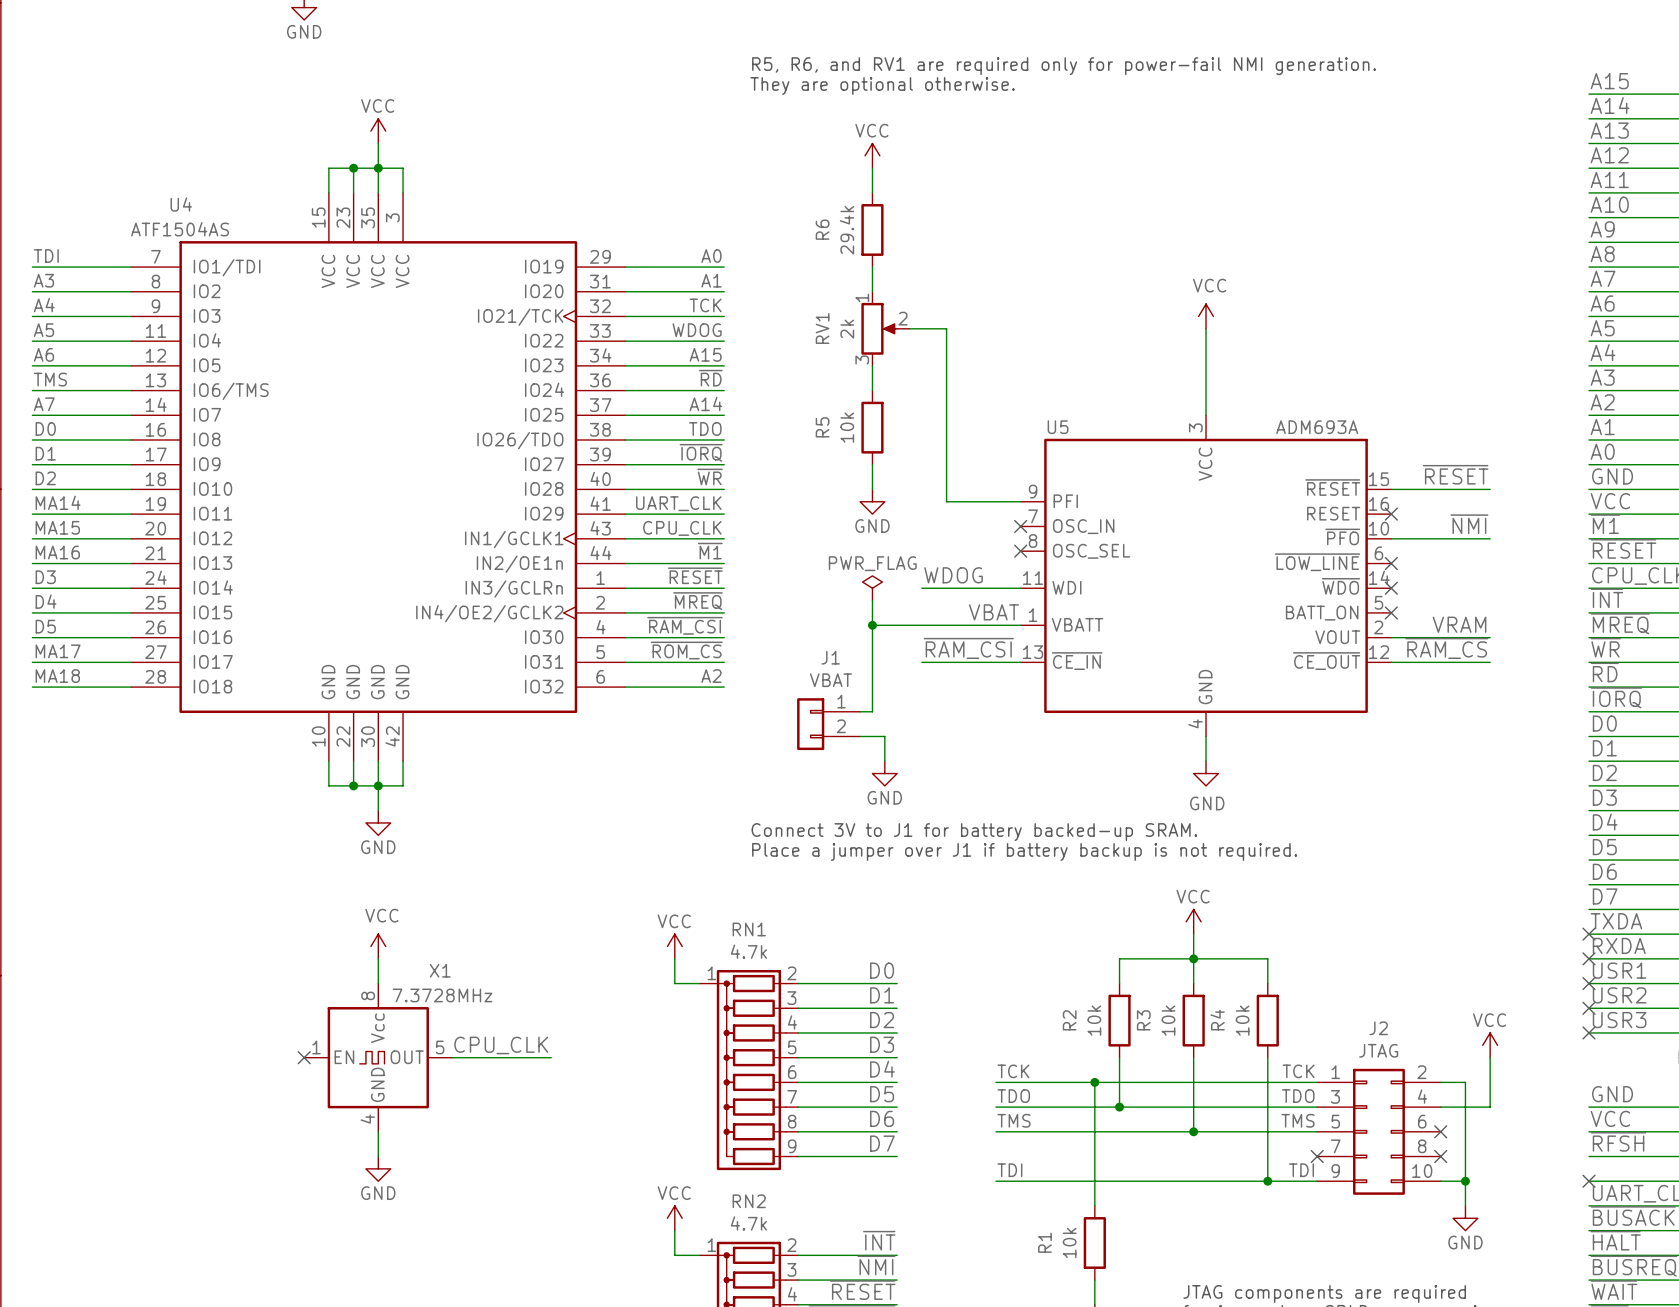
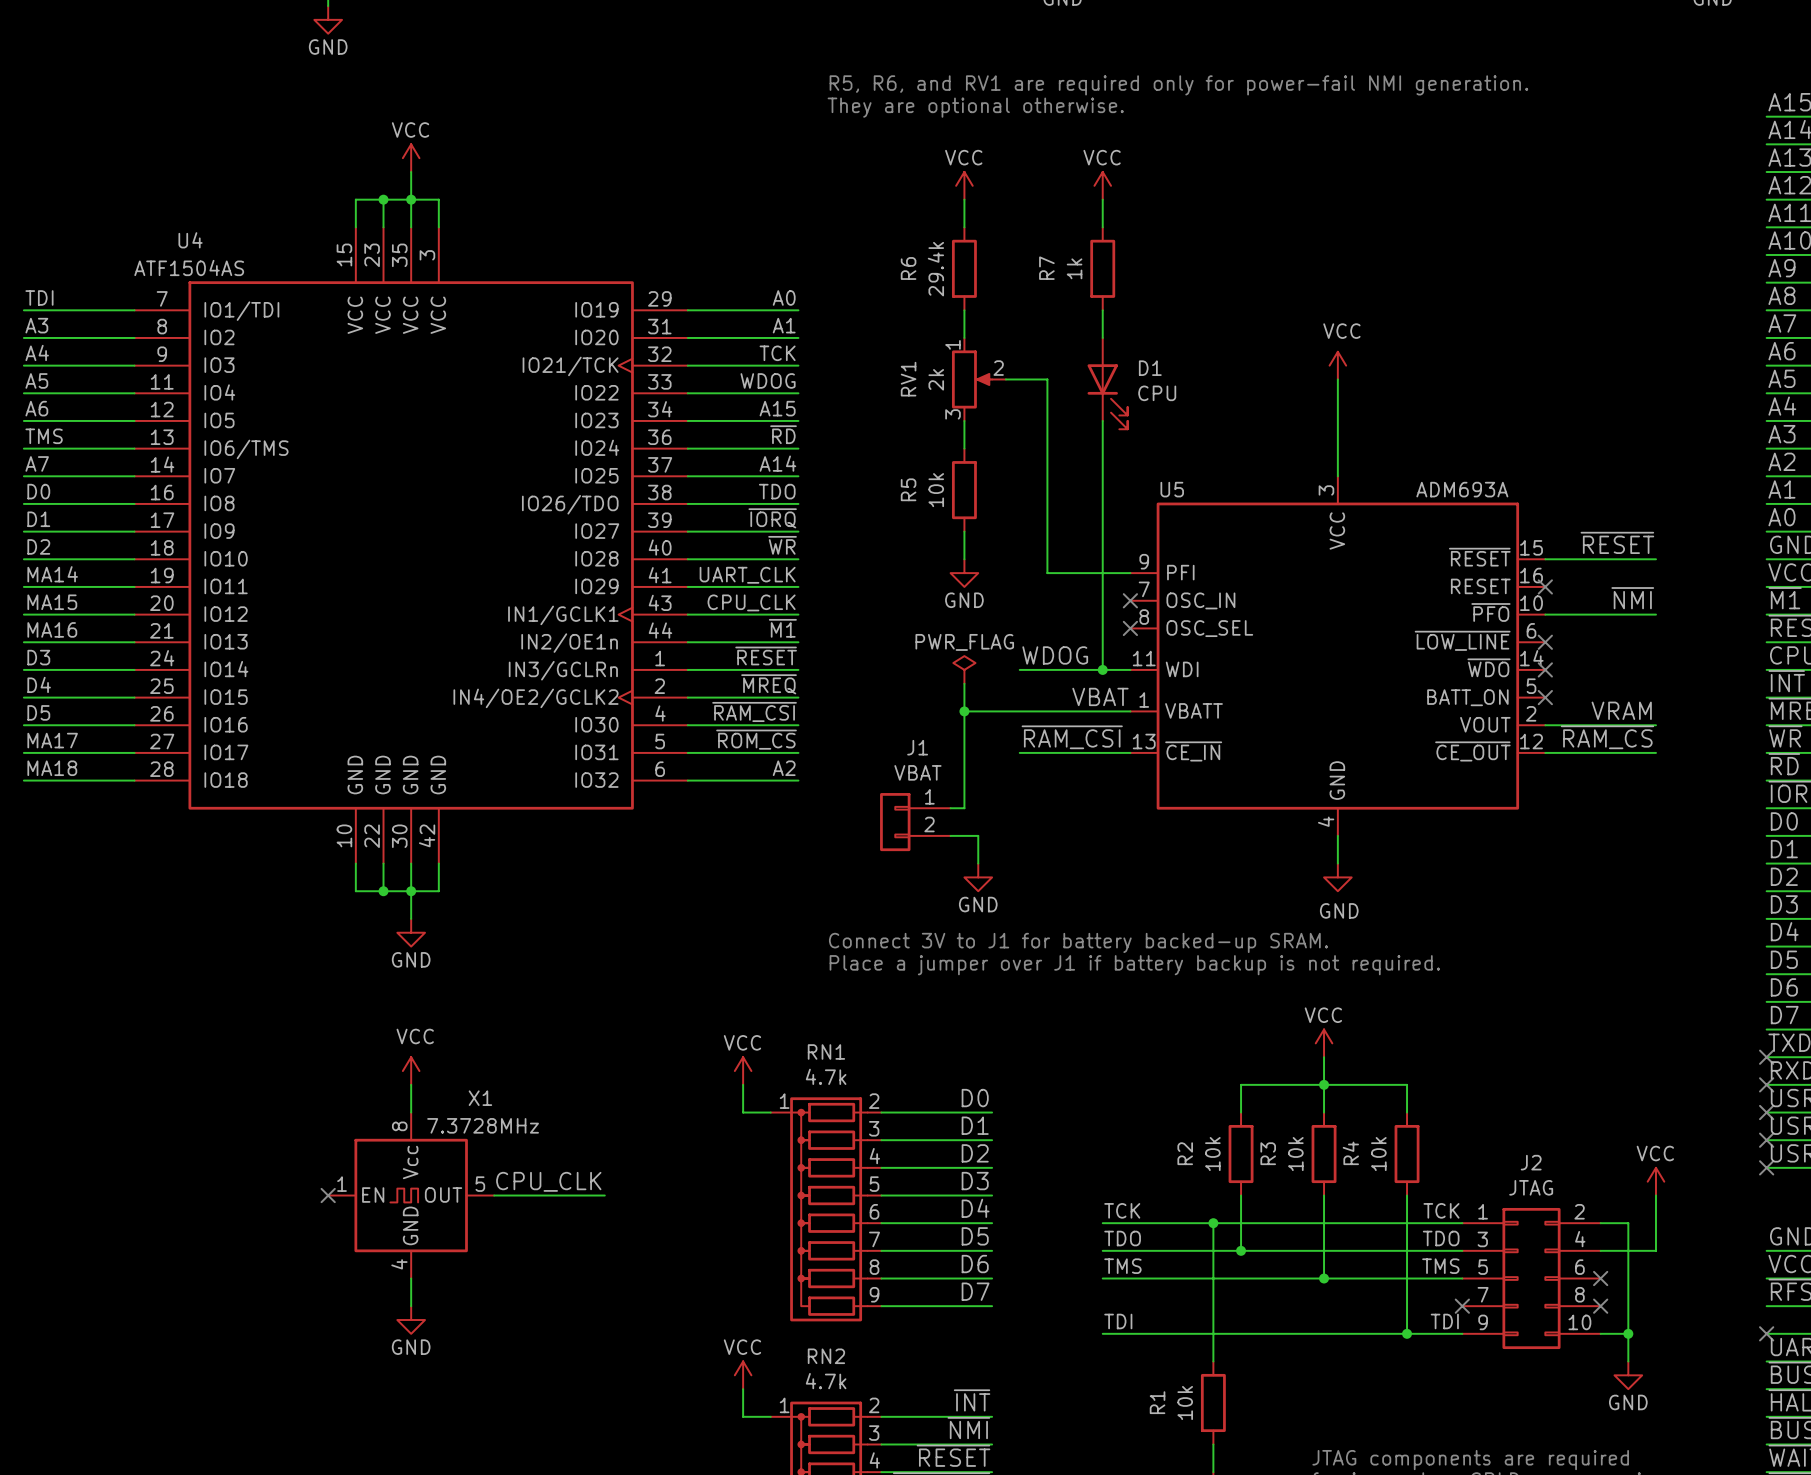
power symbol: none -> VCC (1102, 185)
wire: none -> (1102, 199) (1102, 227)
R7: none -> 1k (1102, 268)
wire: none -> (1102, 310) (1102, 337)
D1: none -> CPU (1107, 383)
wire: none -> (1102, 420) (1102, 669)
junction: none -> (1102, 669)

